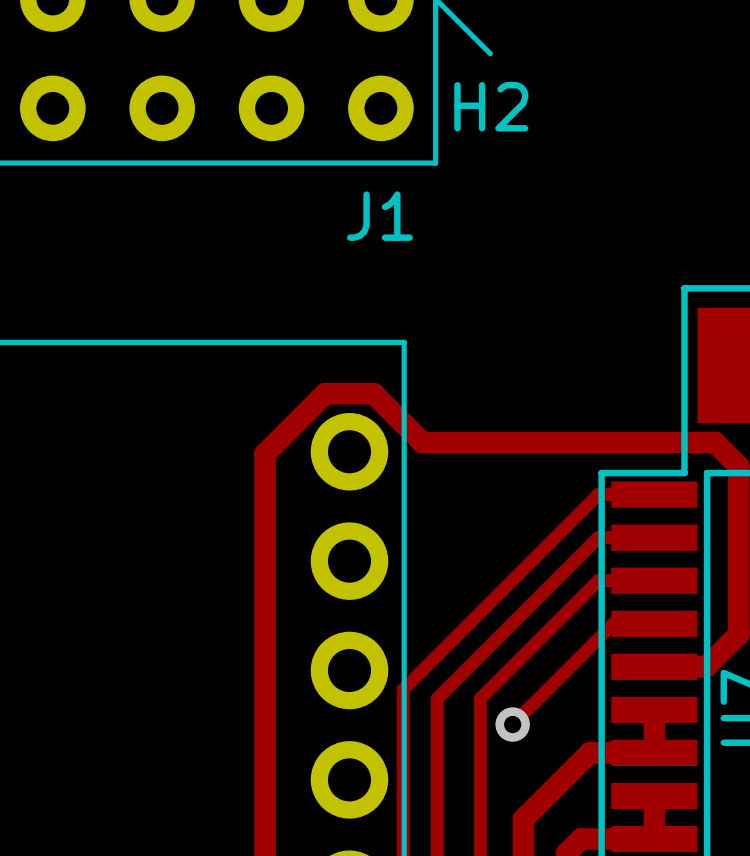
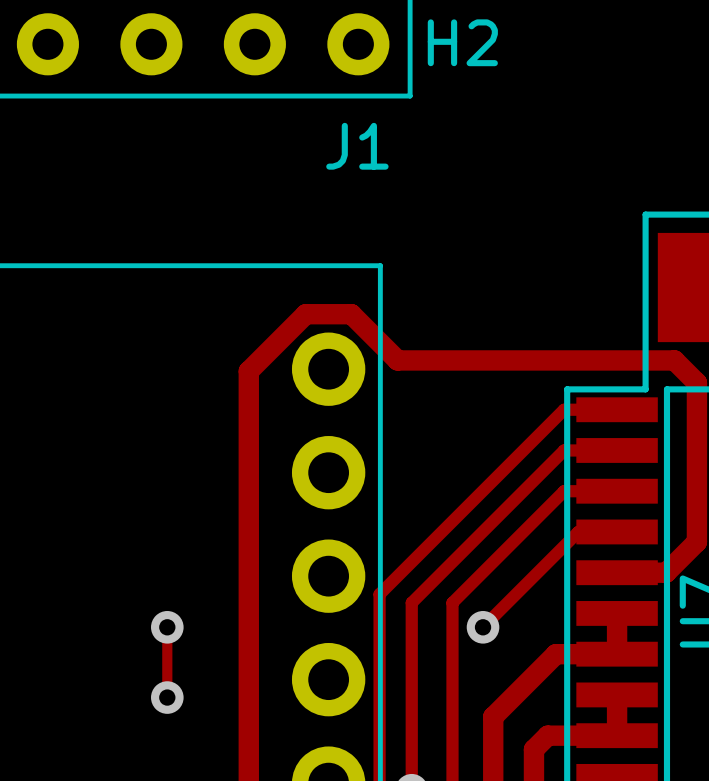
track: none -> (167, 627) (167, 697)
via: none -> (167, 627)
via: none -> (167, 697)

